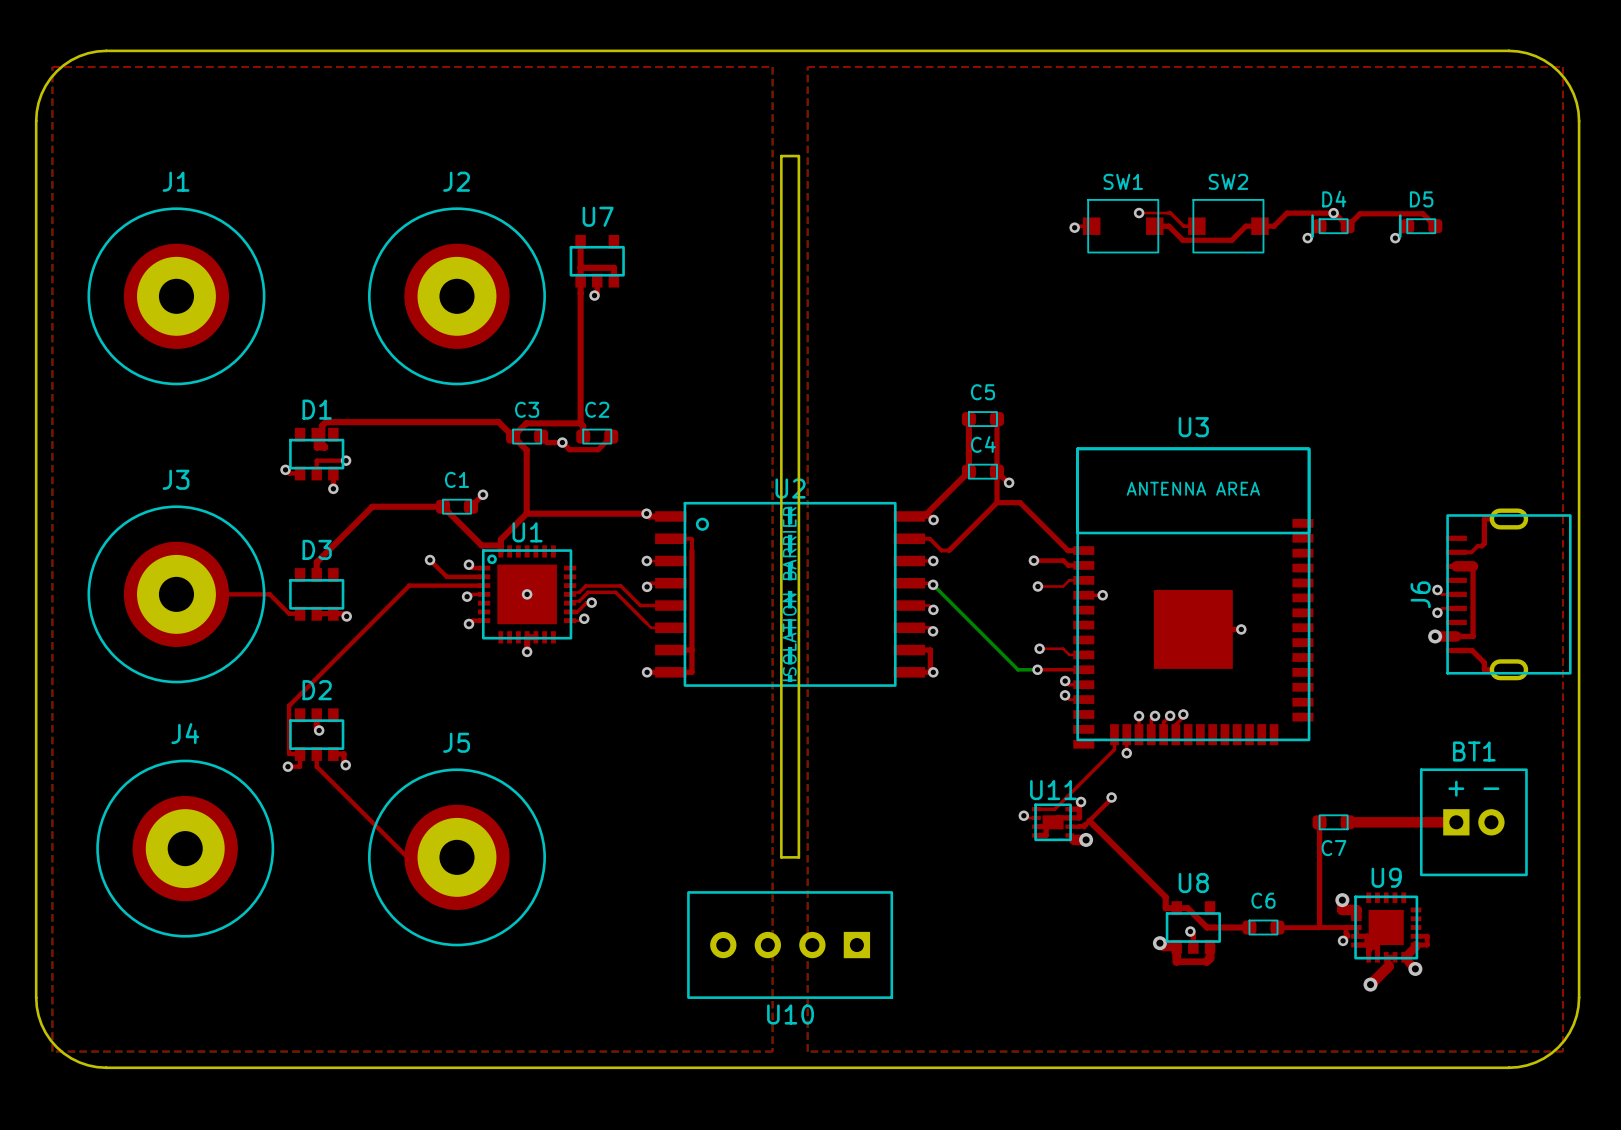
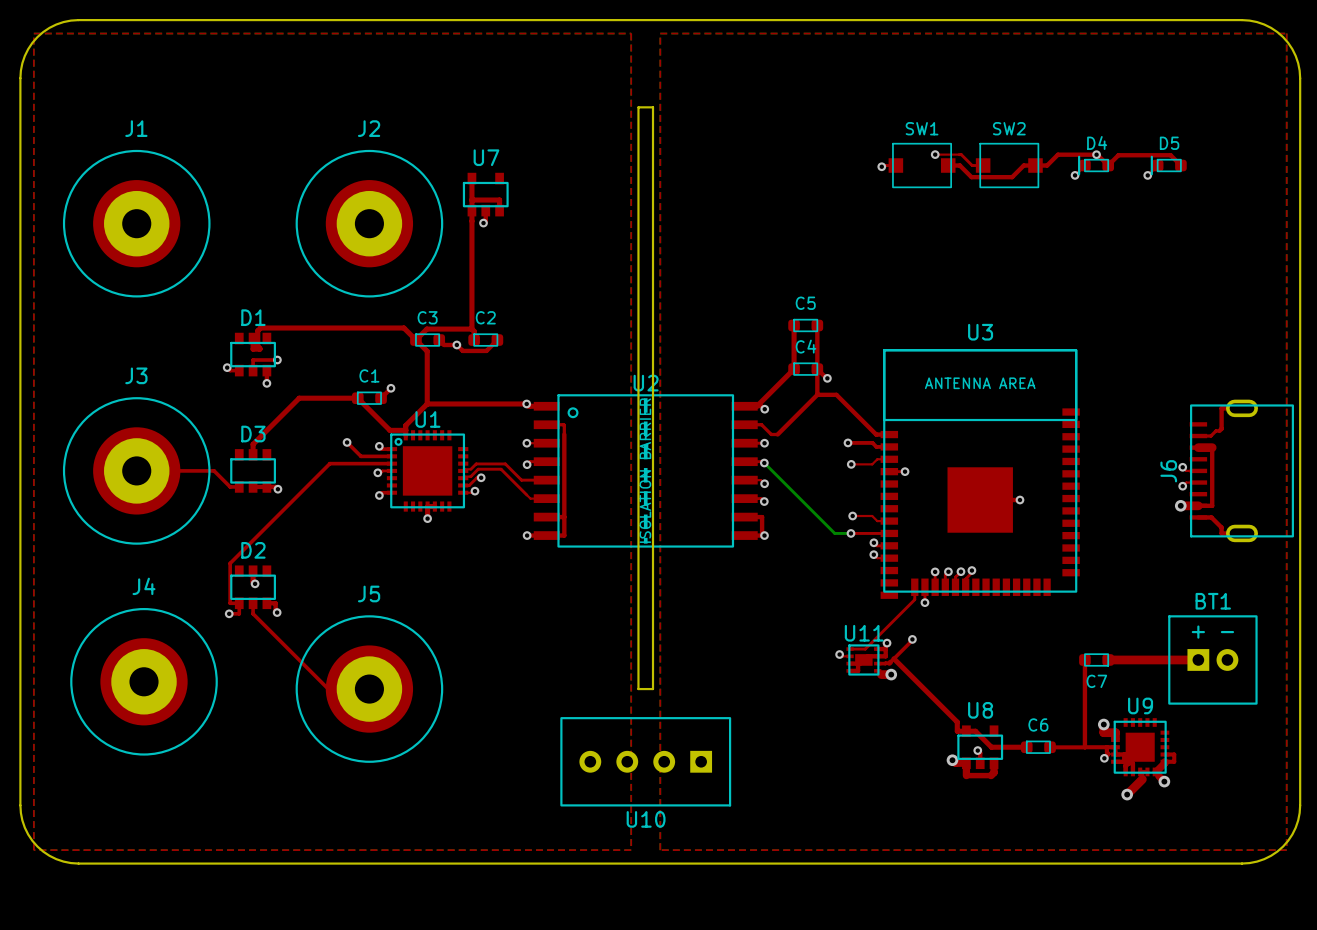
via: (527, 594) -> none

